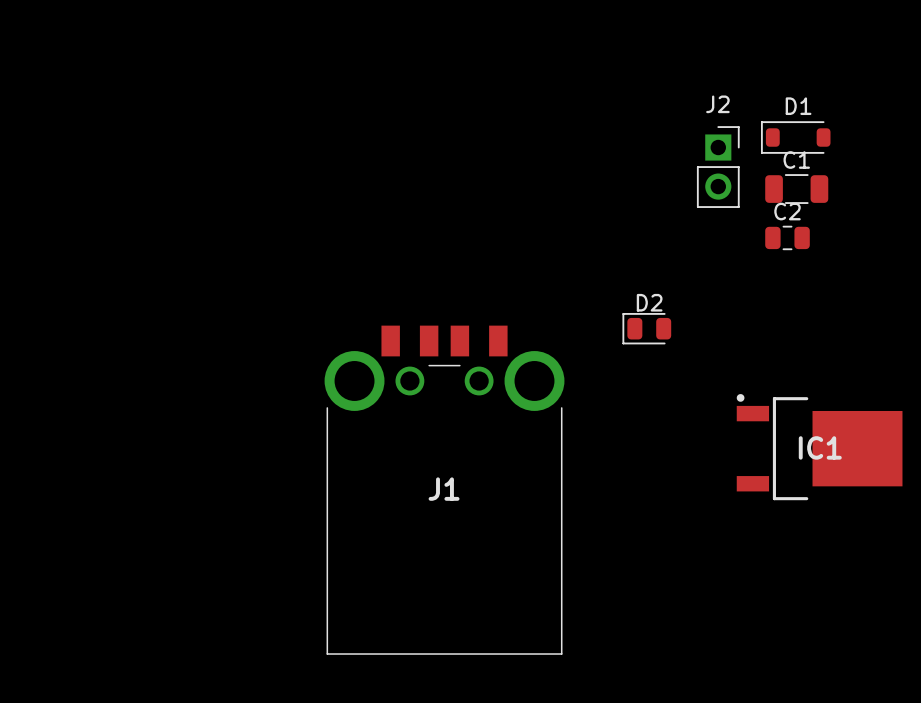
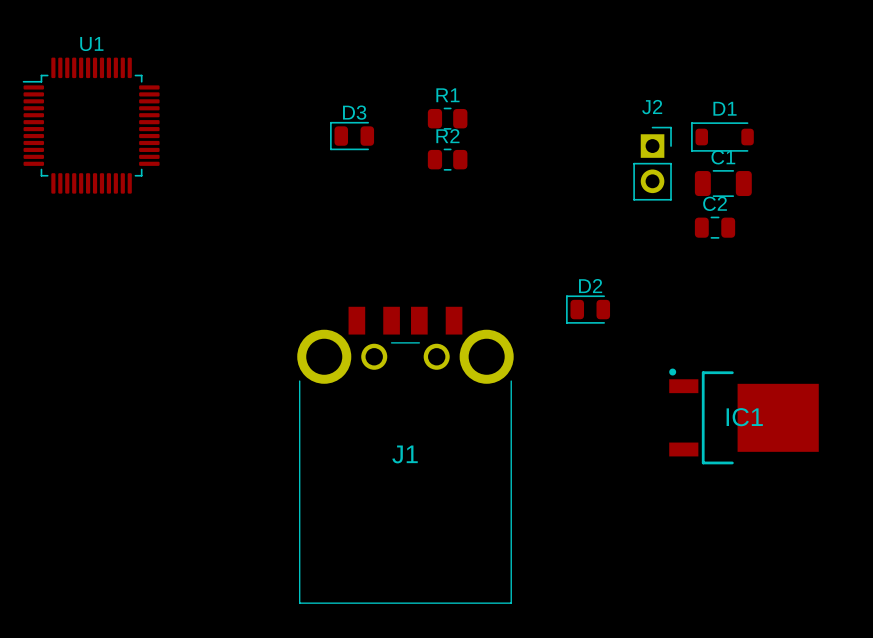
R1: none -> (447, 118)
U1: none -> (91, 125)
D3: none -> (352, 136)
R2: none -> (447, 159)

